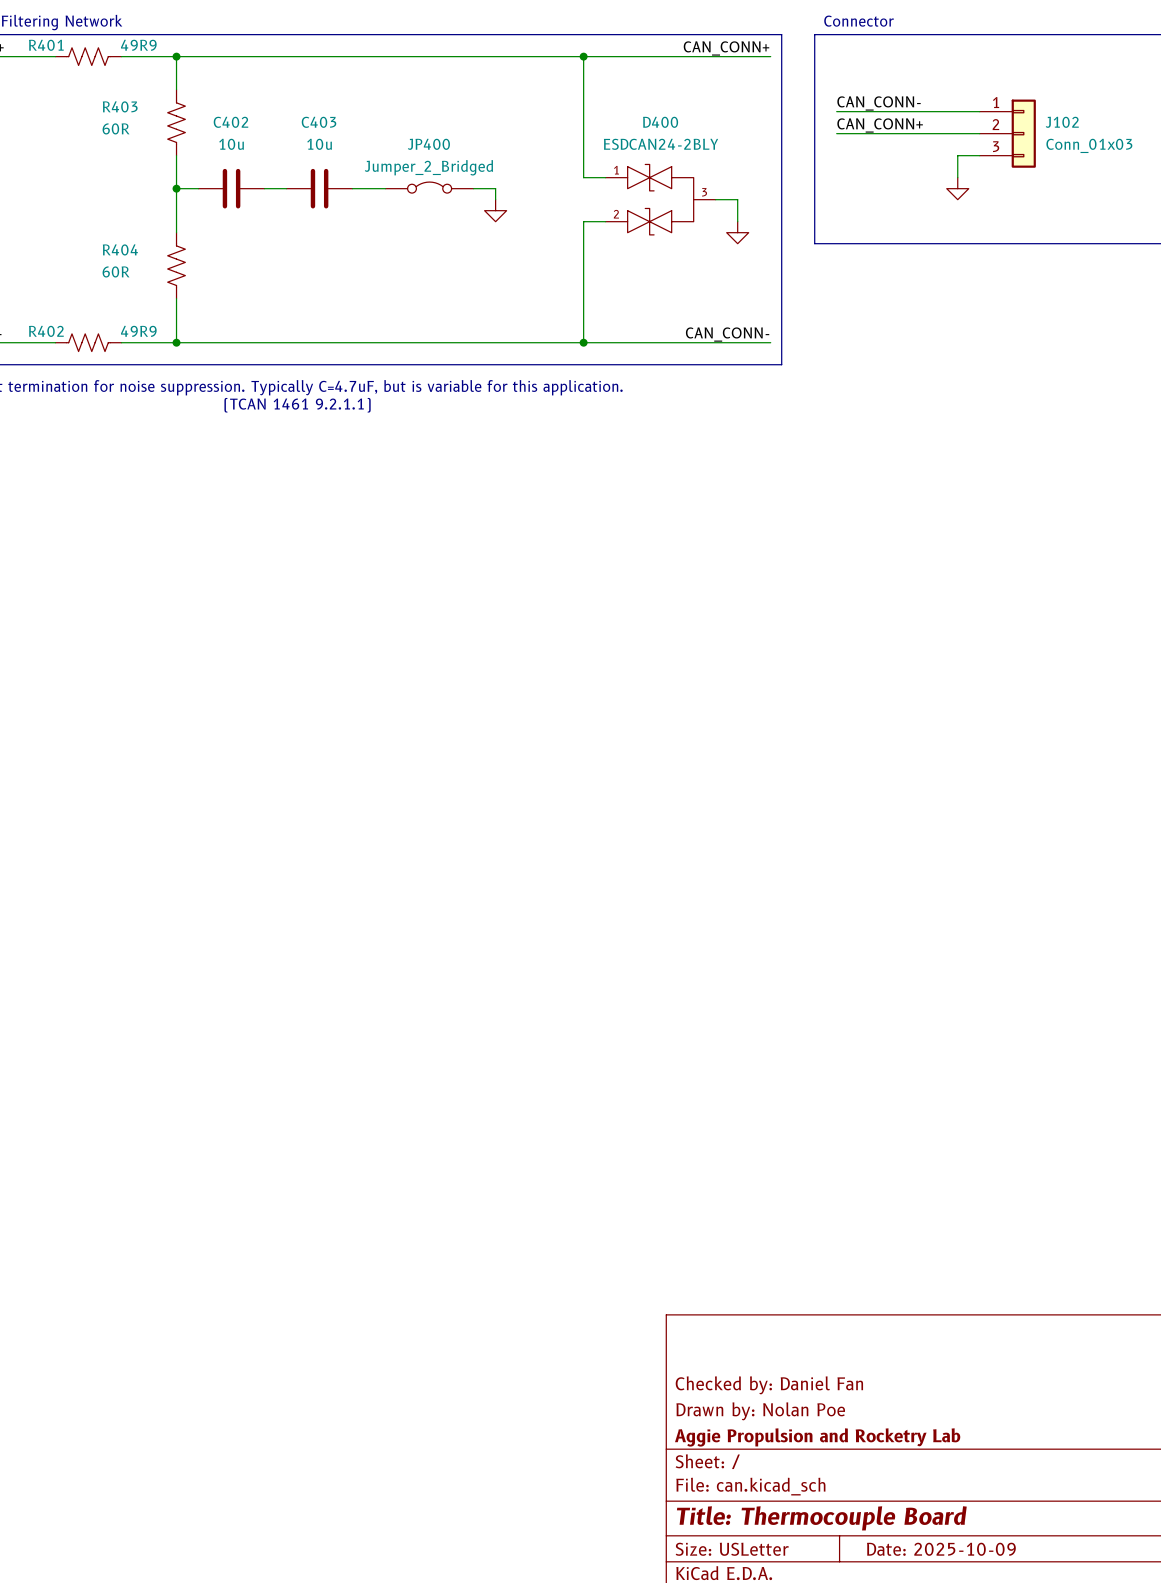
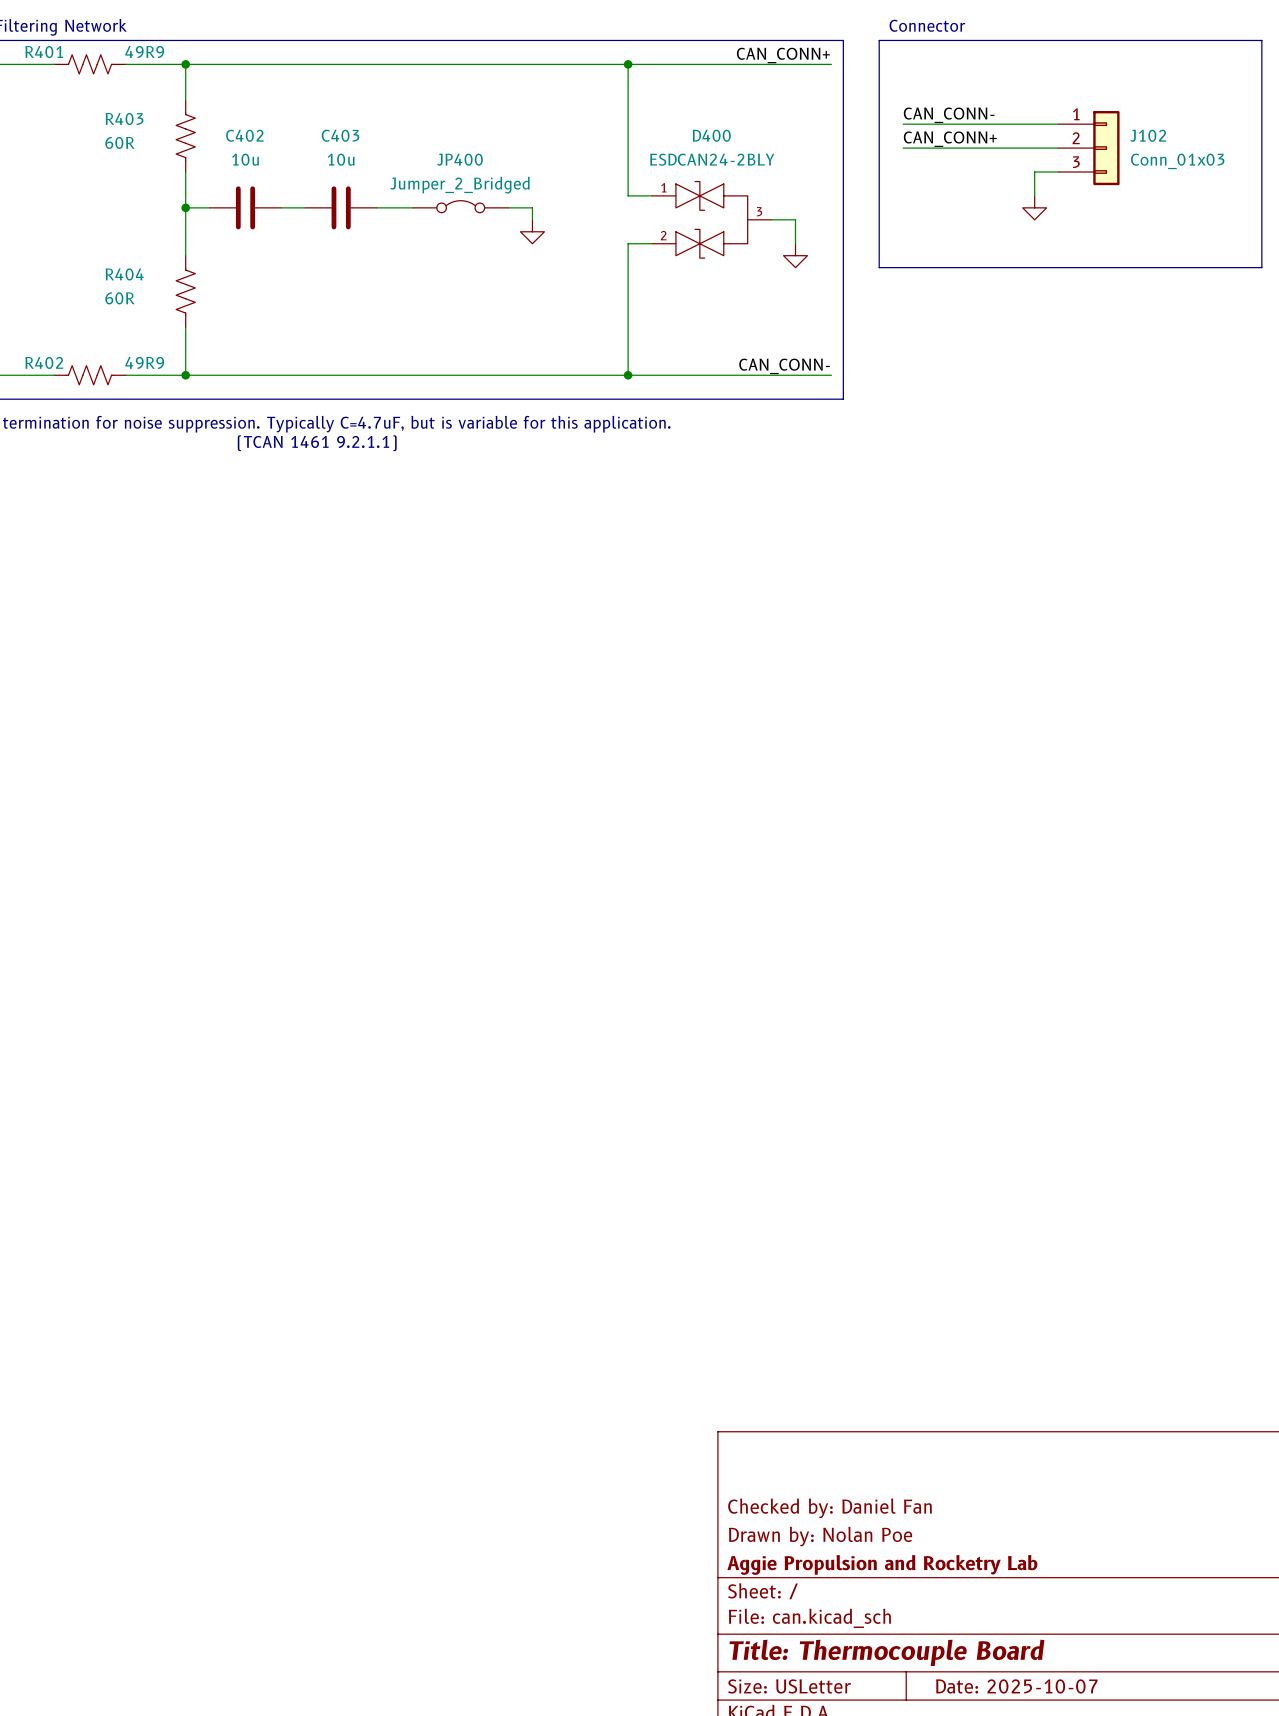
title block: Date: 2025-10-09 (941, 1549) -> Date: 2025-10-07 (1016, 1686)

